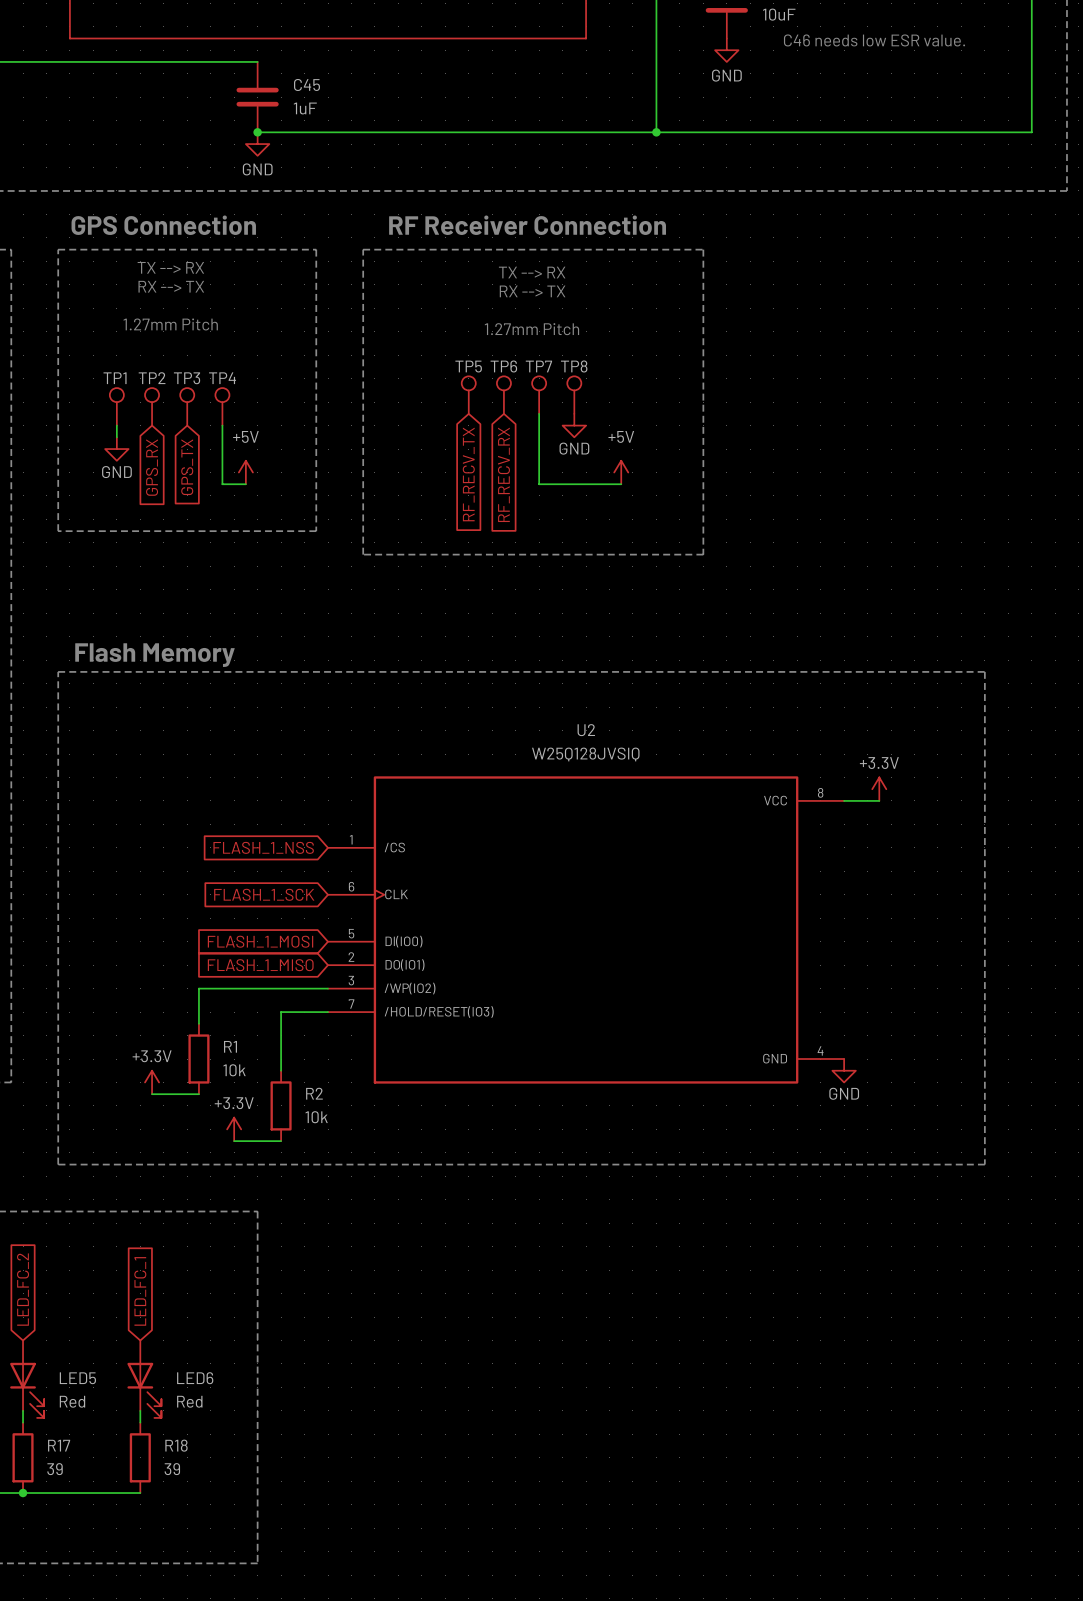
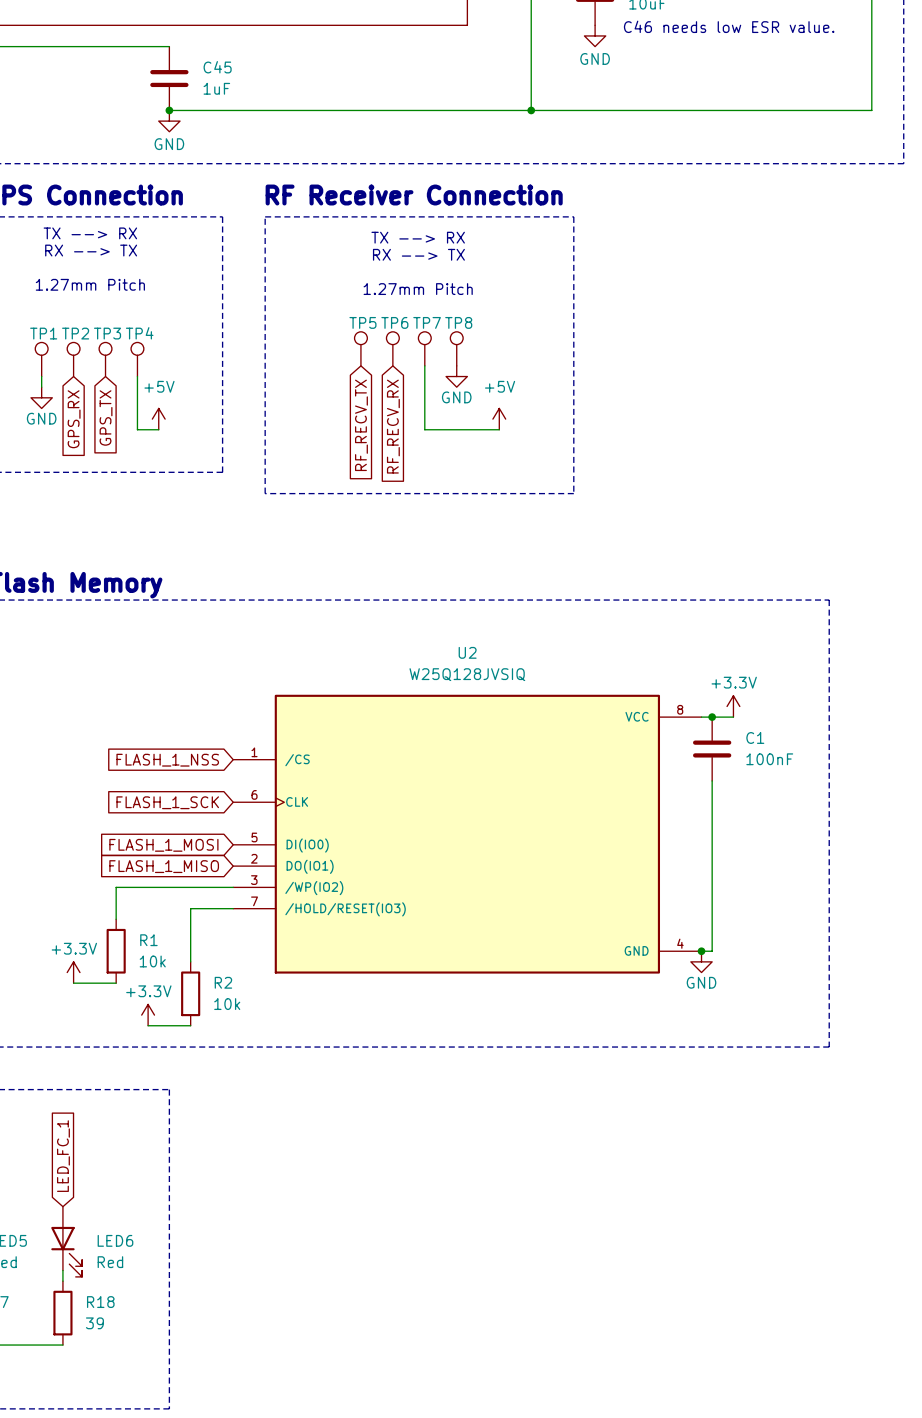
junction: none -> (712, 717)
C1: none -> 100nF (712, 749)
wire: none -> (712, 780) (712, 951) (701, 951)
junction: none -> (701, 951)

